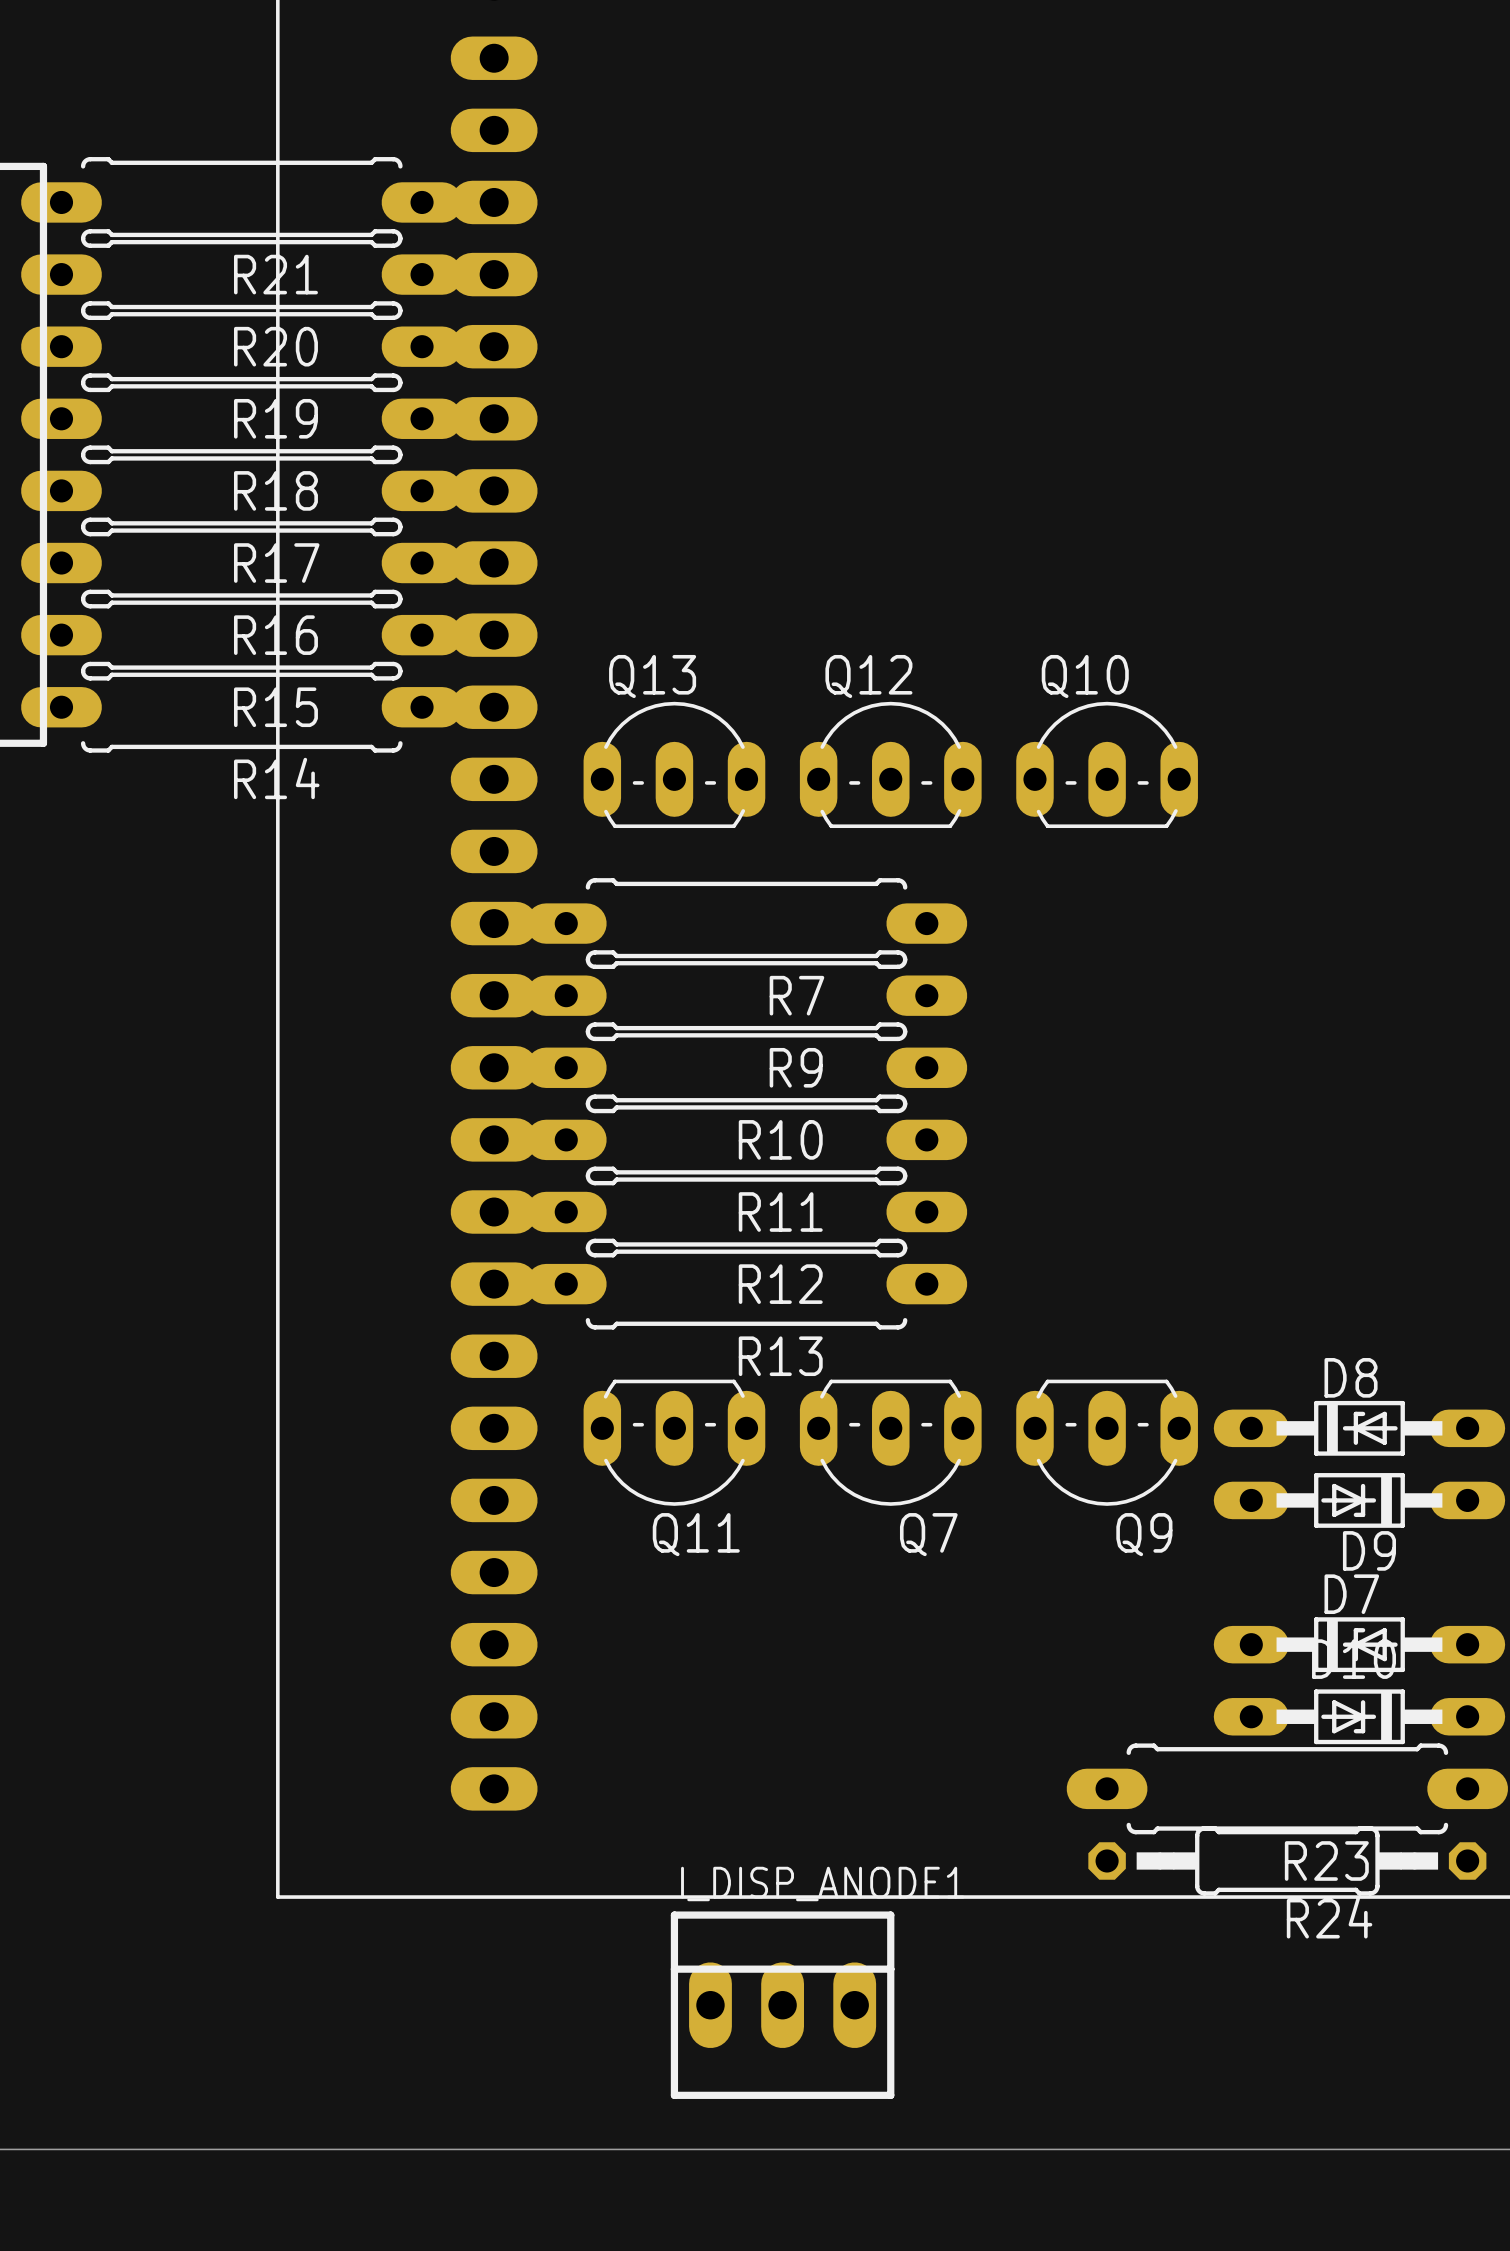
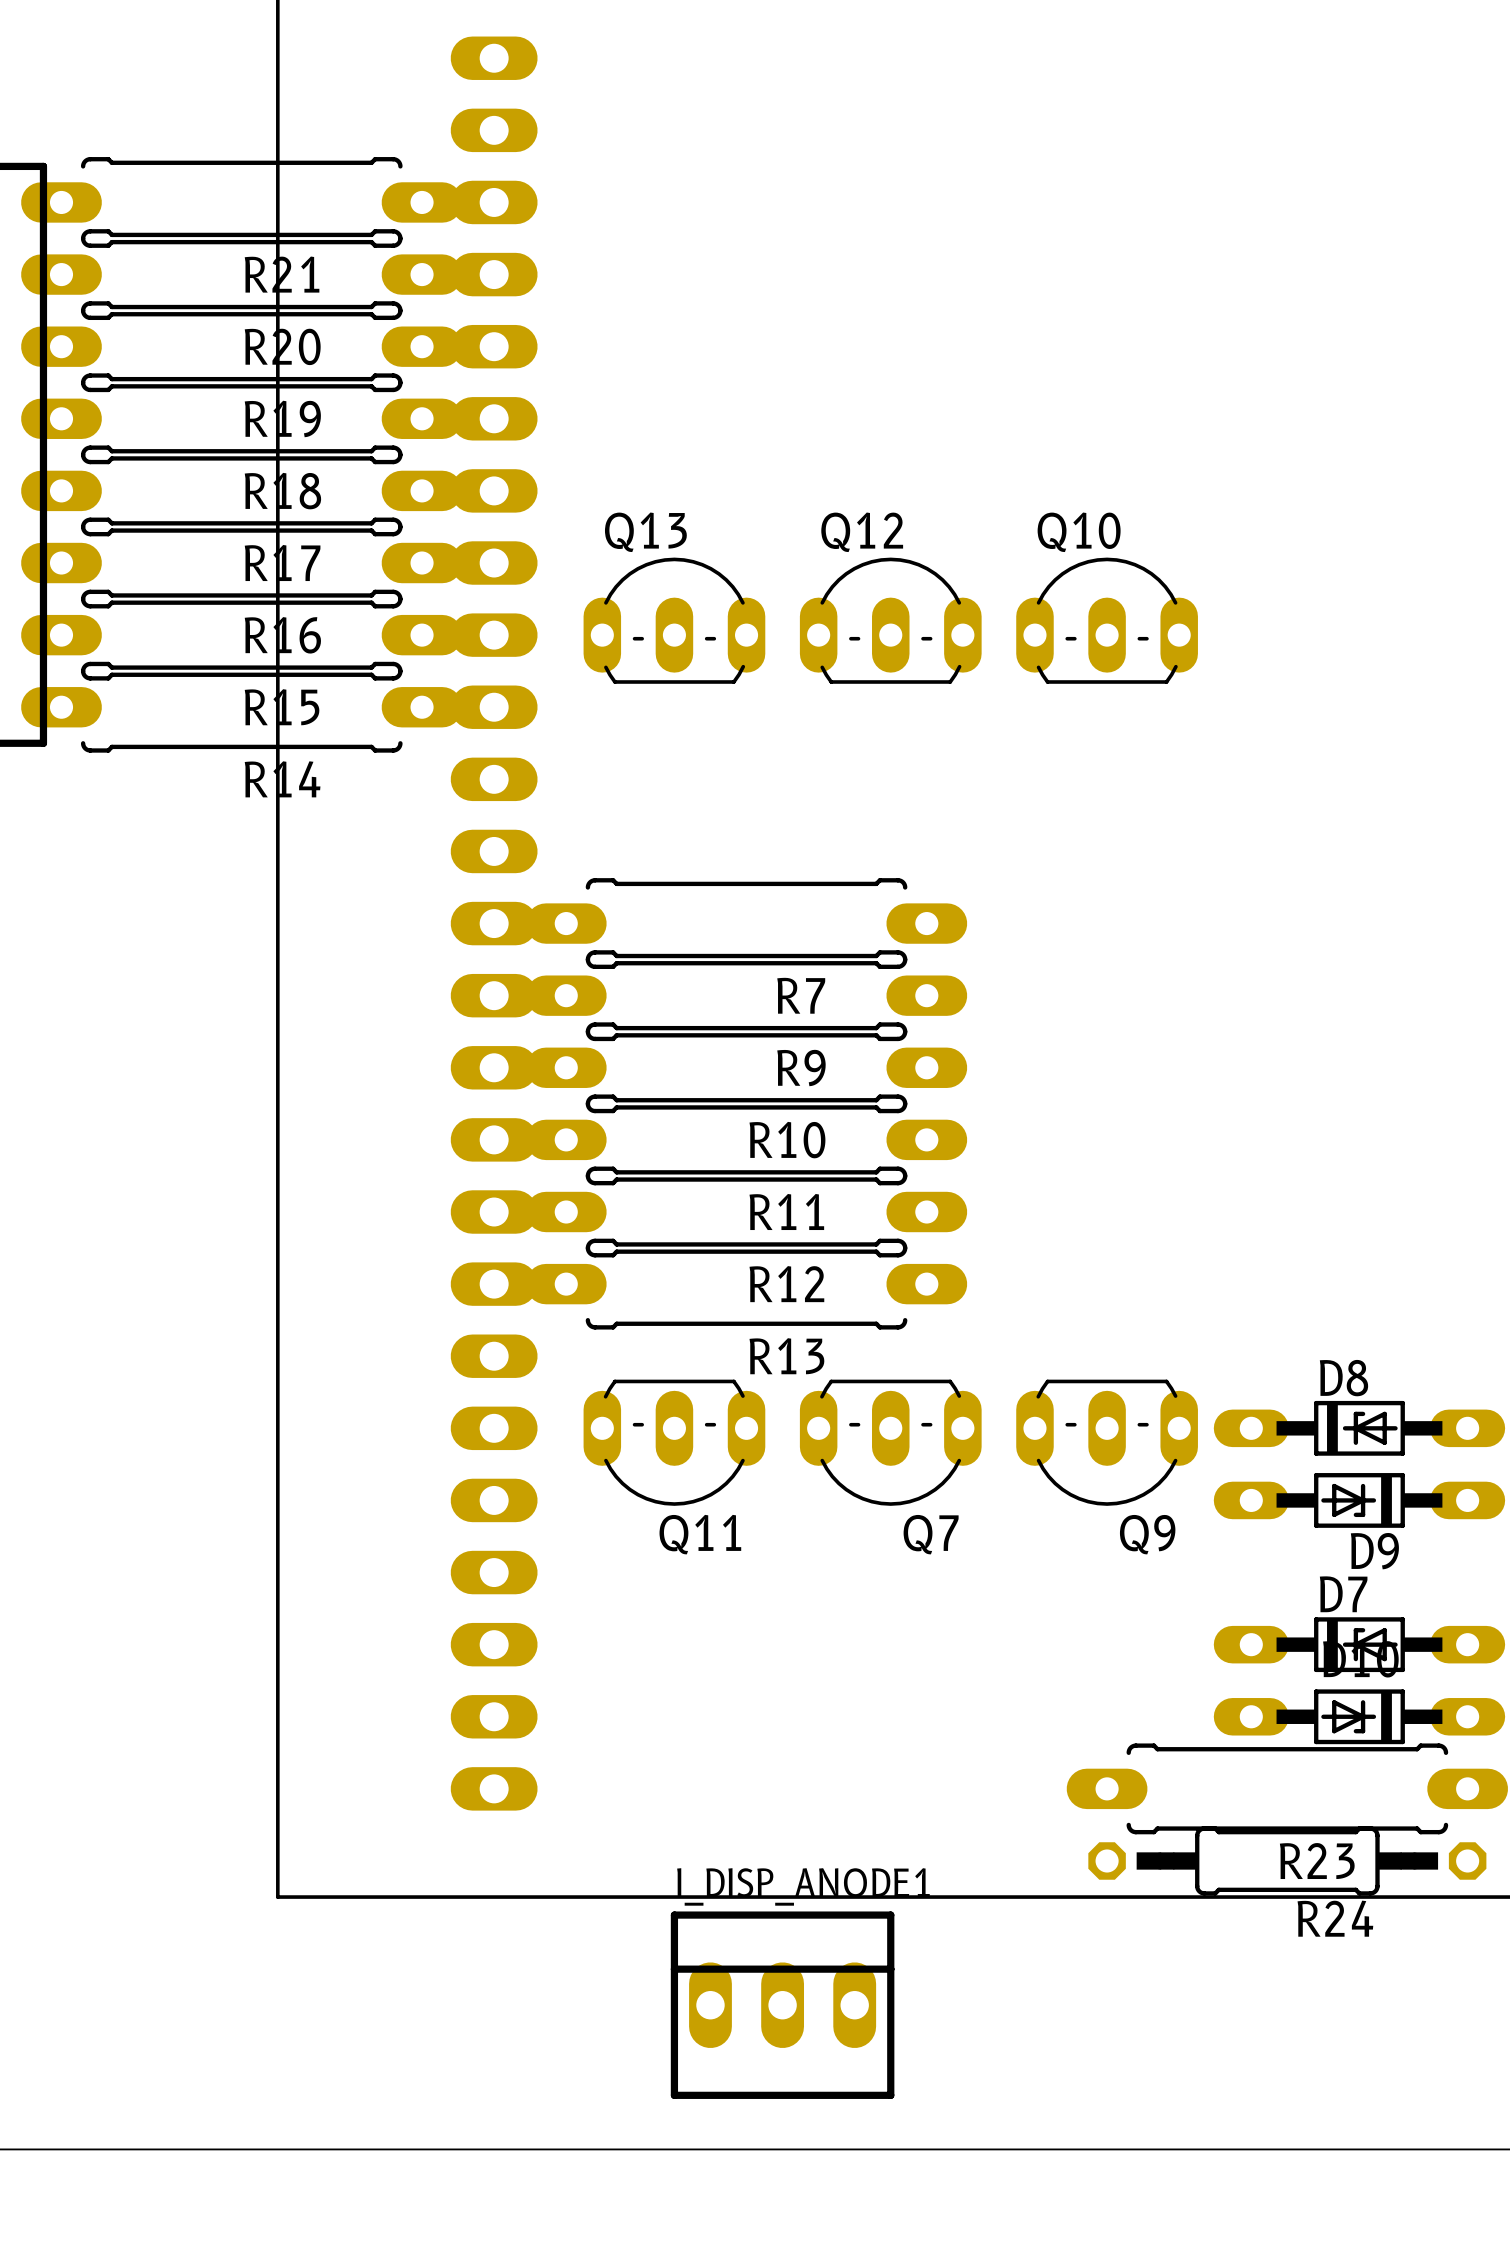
Q13 position: (674, 764) -> (674, 620)
Q12 position: (890, 764) -> (890, 620)
Q10 position: (1107, 764) -> (1107, 620)

